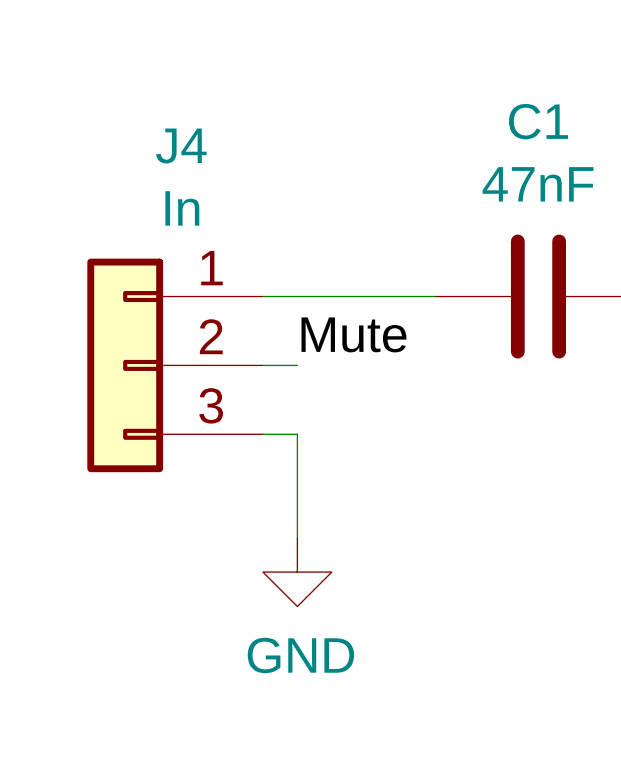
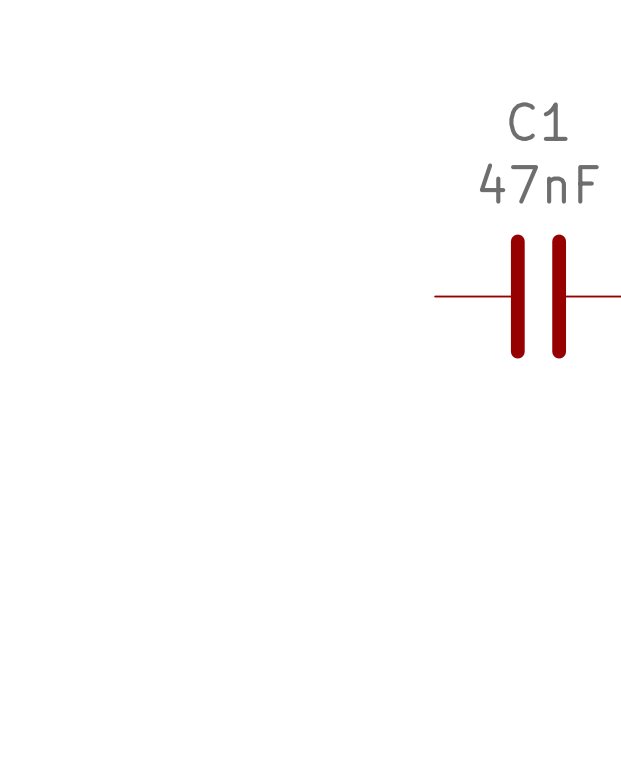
wire: (262, 296) (435, 296) -> none
label: Mute (353, 334) -> none
J4: In (175, 365) -> none
wire: (262, 365) (297, 365) -> none
wire: (262, 434) (297, 434) (297, 537) -> none
power symbol: GND (297, 572) -> none

